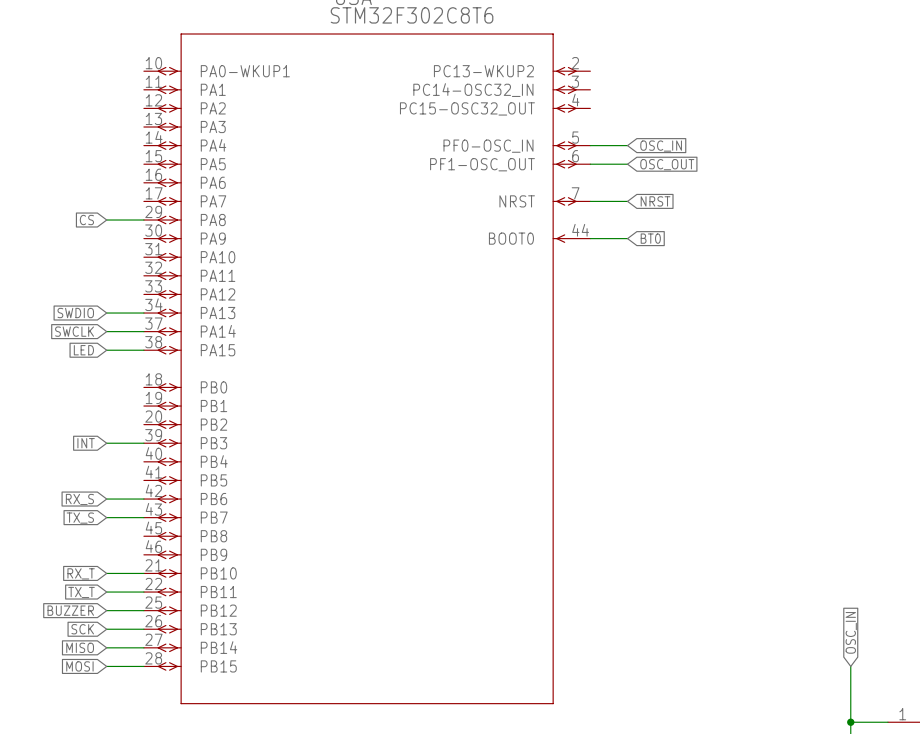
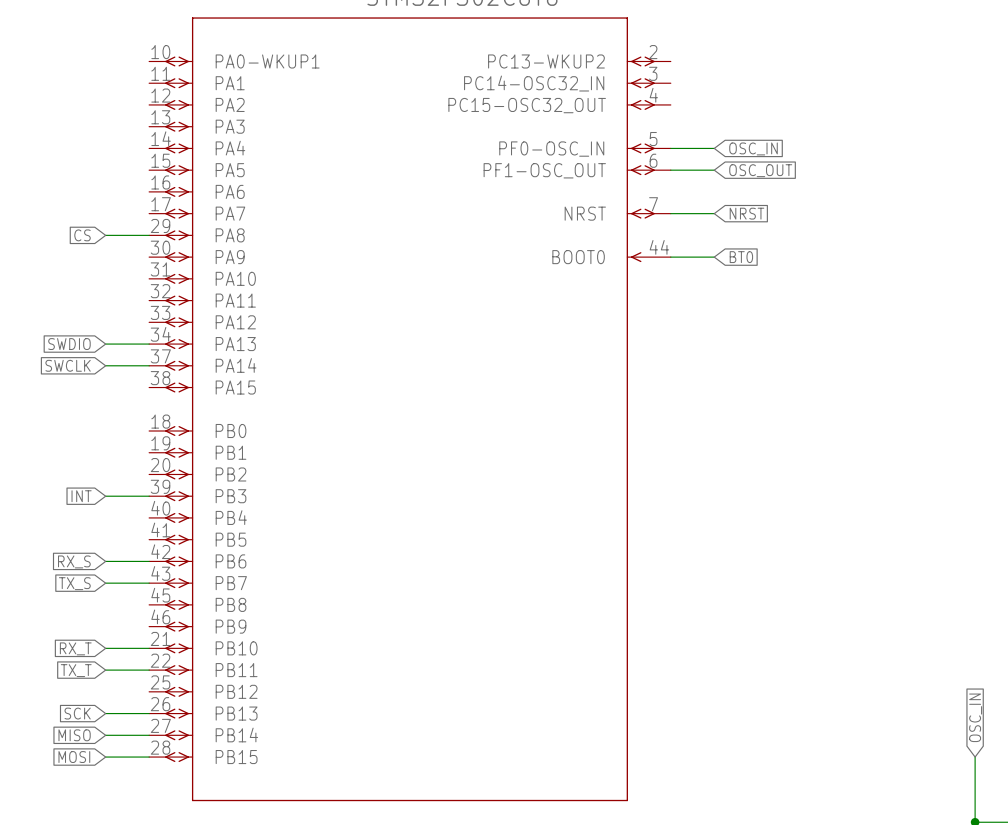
global label: LED (83, 350) -> none
wire: (106, 350) (143, 350) -> none
global label: BUZZER (70, 610) -> none
wire: (106, 610) (143, 610) -> none

